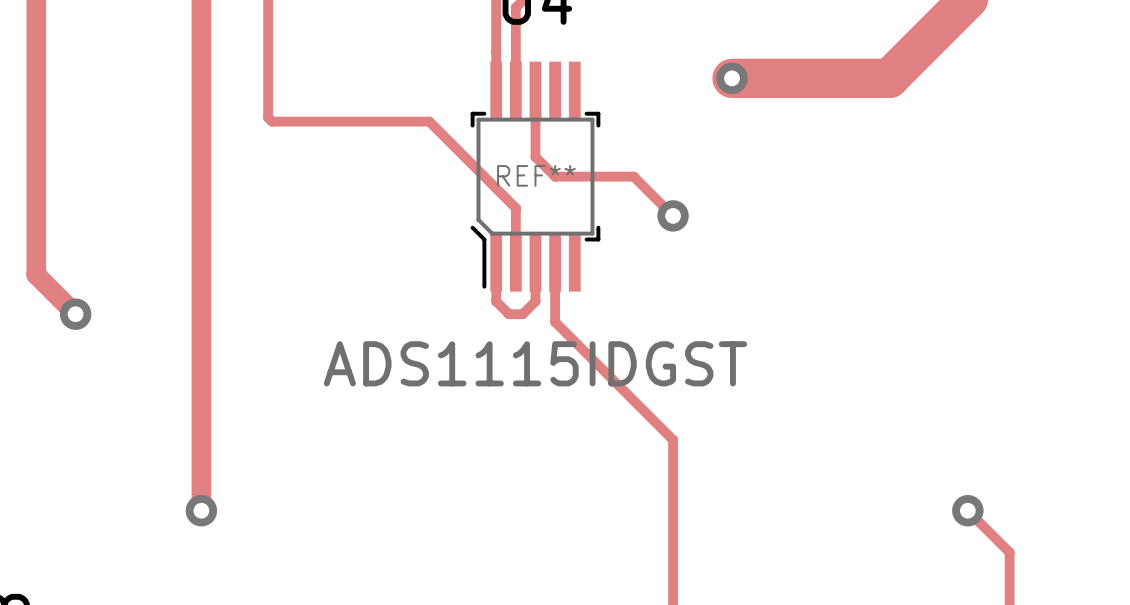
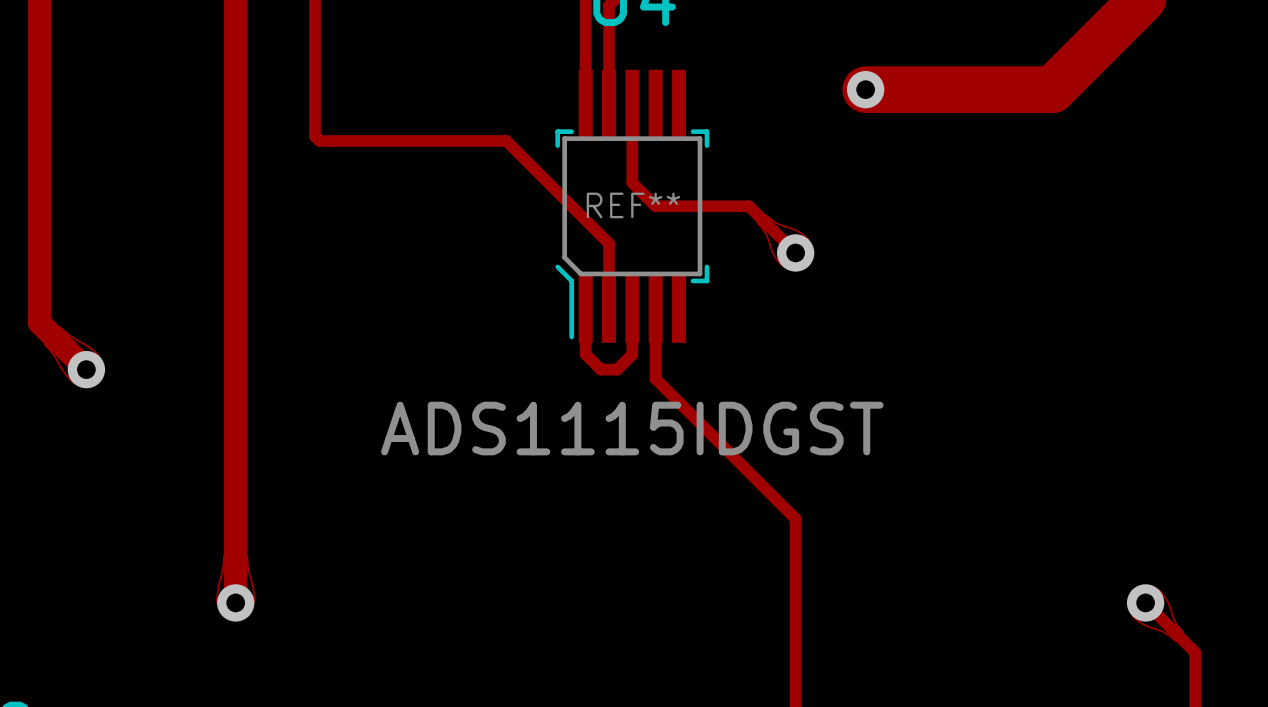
zone outline: none -> (765, 214) (775, 222) (799, 232) (808, 239) (802, 259) (782, 266) (777, 261) (765, 232) (757, 223) (765, 214)
zone outline: none -> (60, 327) (99, 356) (92, 376) (73, 382) (44, 343) (60, 327)
zone outline: none -> (224, 554) (217, 602) (235, 612) (254, 602) (247, 554) (224, 554)
zone outline: none -> (1158, 589) (1168, 603) (1176, 623) (1183, 632) (1175, 641) (1165, 633) (1146, 625) (1132, 616) (1139, 596) (1158, 589)

